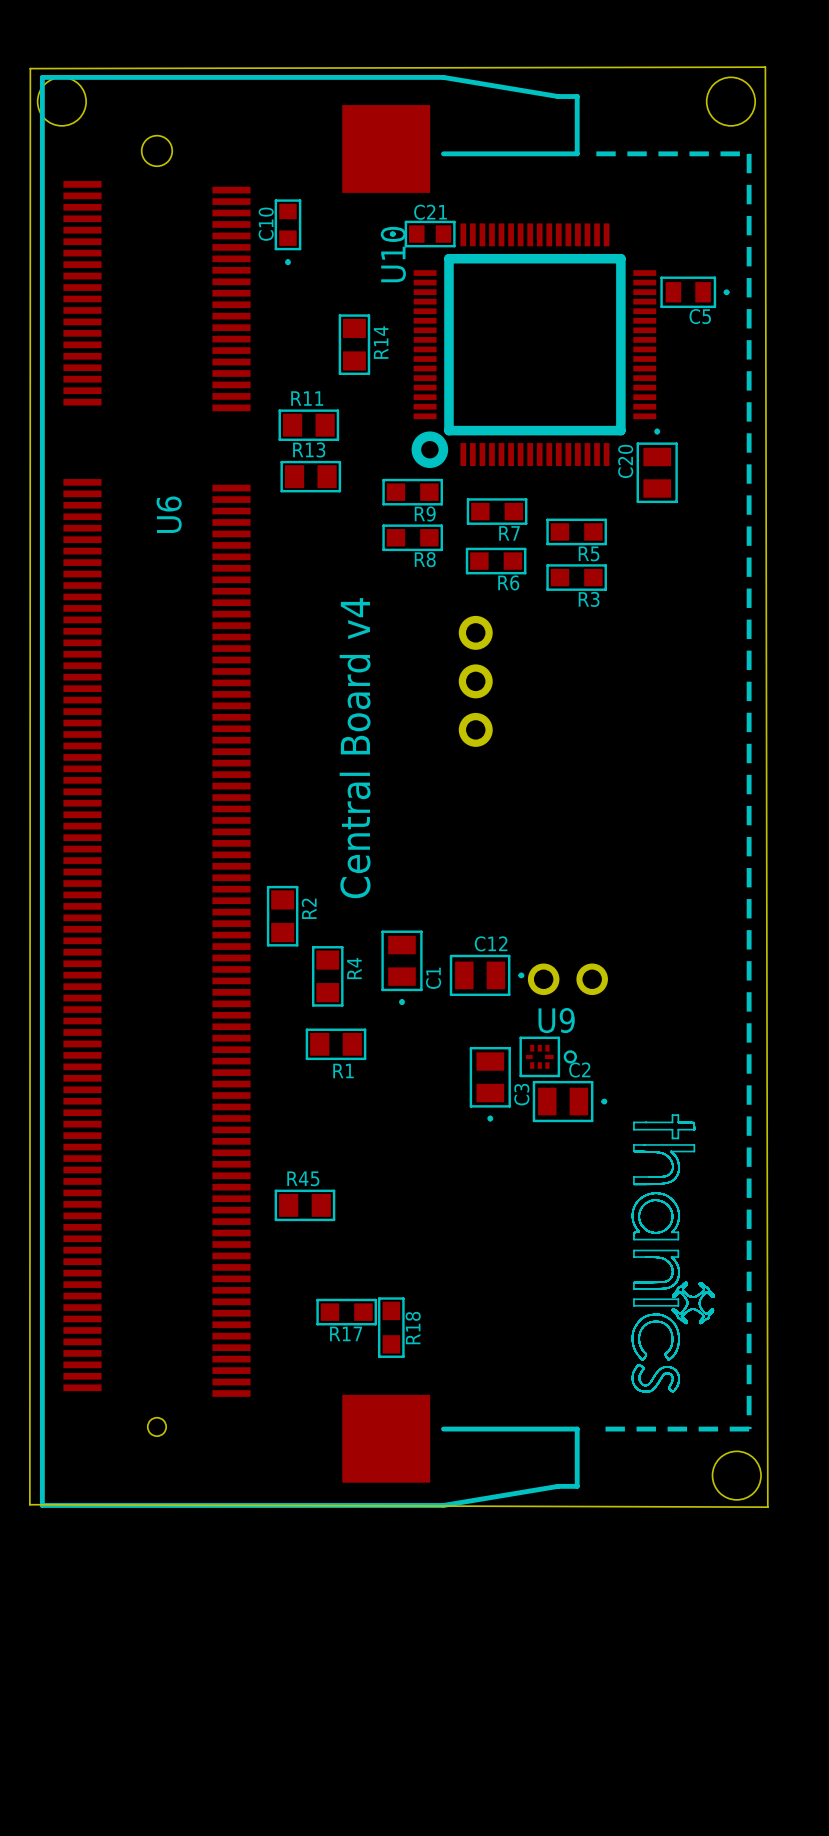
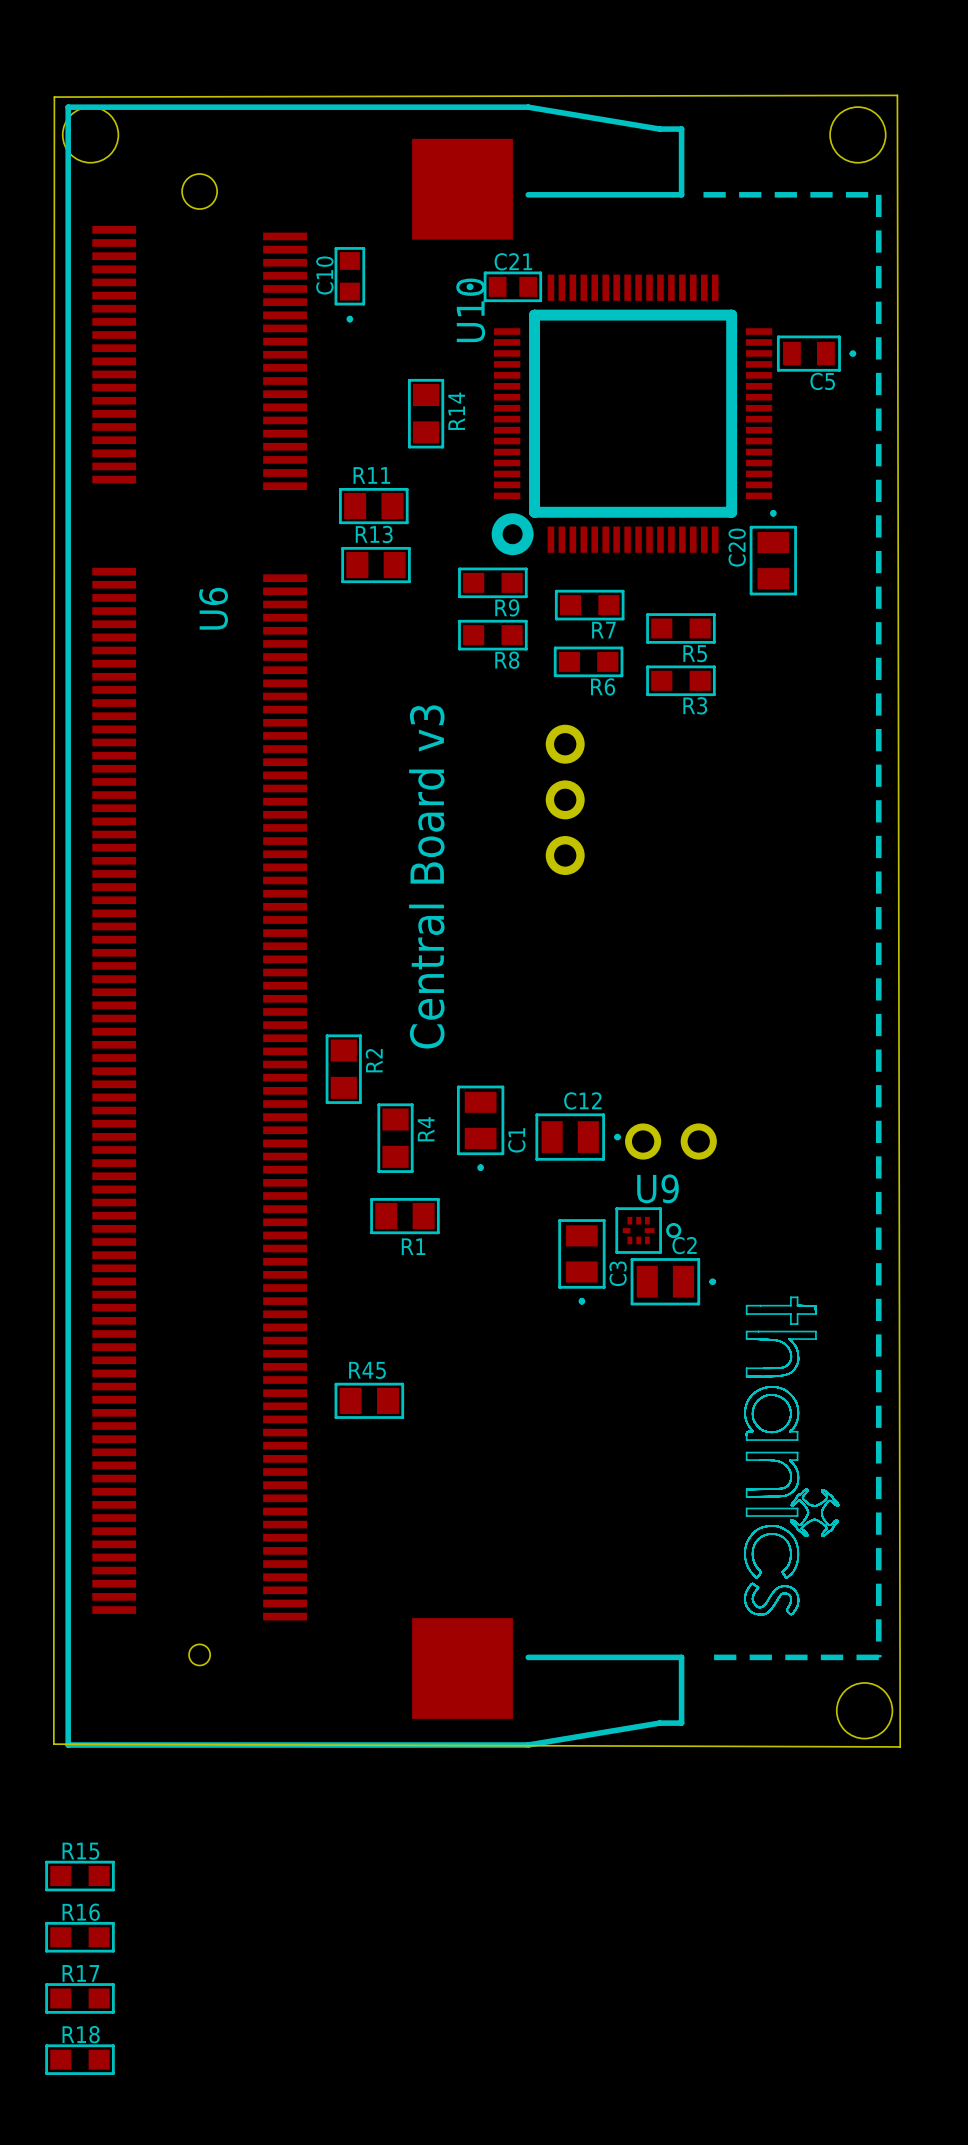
text: Central Board v4 (355, 748) -> Central Board v3 (426, 876)
R17 position: (346, 1312) -> (79, 1998)
R18 rotation: 0° (391, 1327) -> 90° clockwise (79, 2059)
R18 position: (391, 1327) -> (79, 2059)
R17 name position: R17 (346, 1333) -> R17 (80, 1973)
R15: none -> (79, 1876)
R16: none -> (79, 1937)

